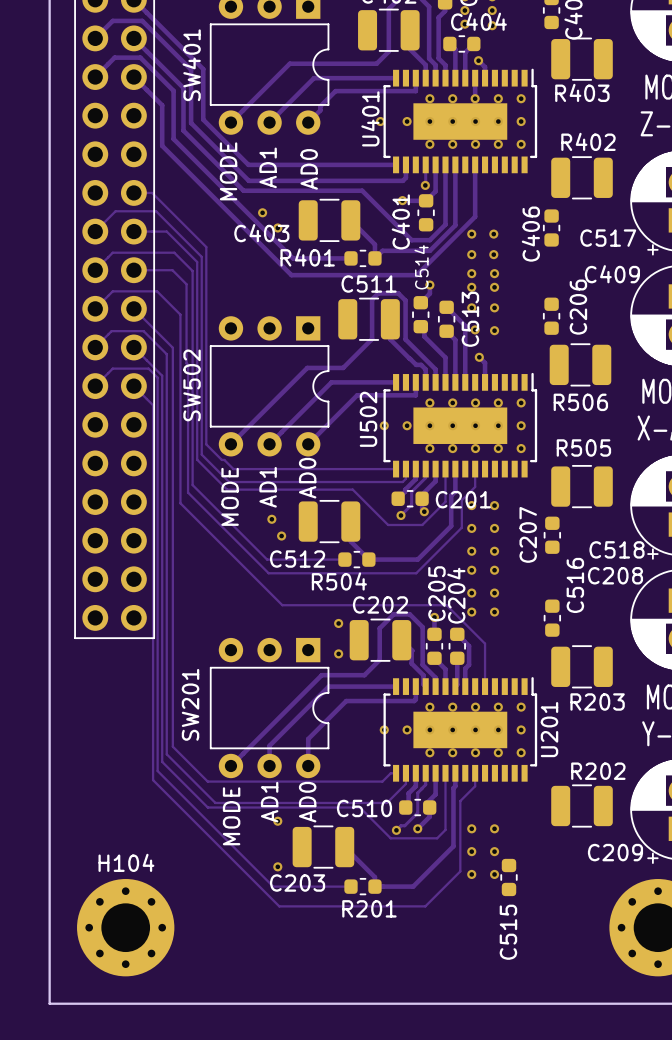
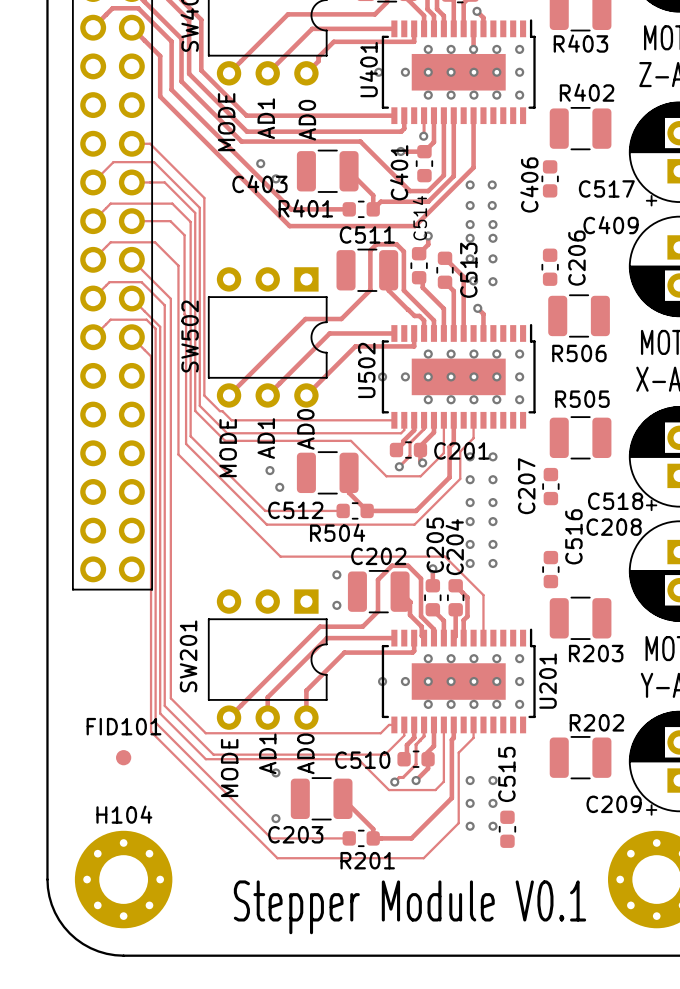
FID101: none -> (123, 757)
board edge: (49, 927) (49, 1003) (125, 1003) -> (47, 879) (51, 904) (59, 920) (69, 933) (83, 944) (98, 951) (123, 955)
C515 name position: C515 (508, 932) -> C515 (506, 774)
text: none -> Stepper Module V0.1 (409, 907)

